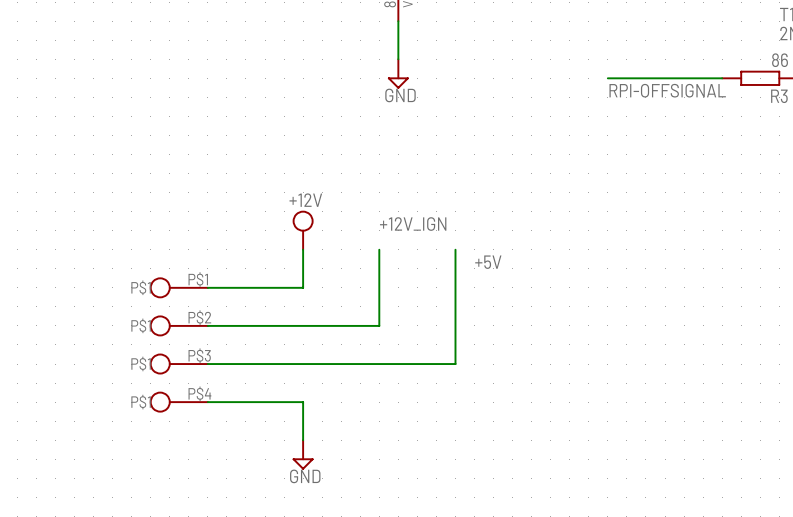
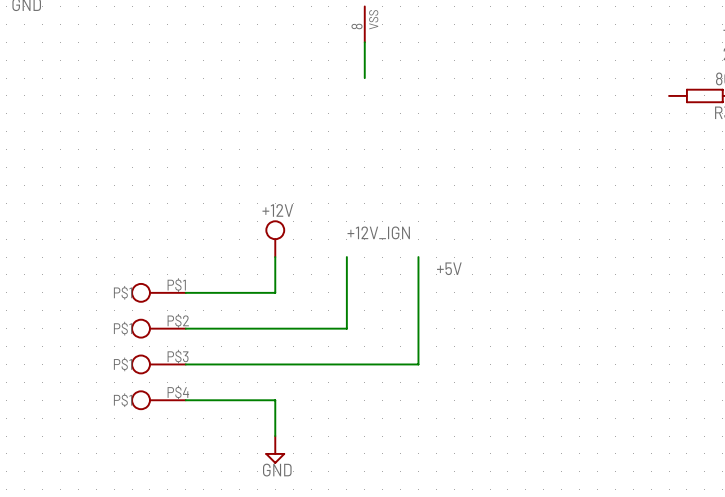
power symbol: GND (398, 74) -> none
wire: (607, 78) (722, 78) -> none
label: RPI-OFFSIGNAL (667, 90) -> none

